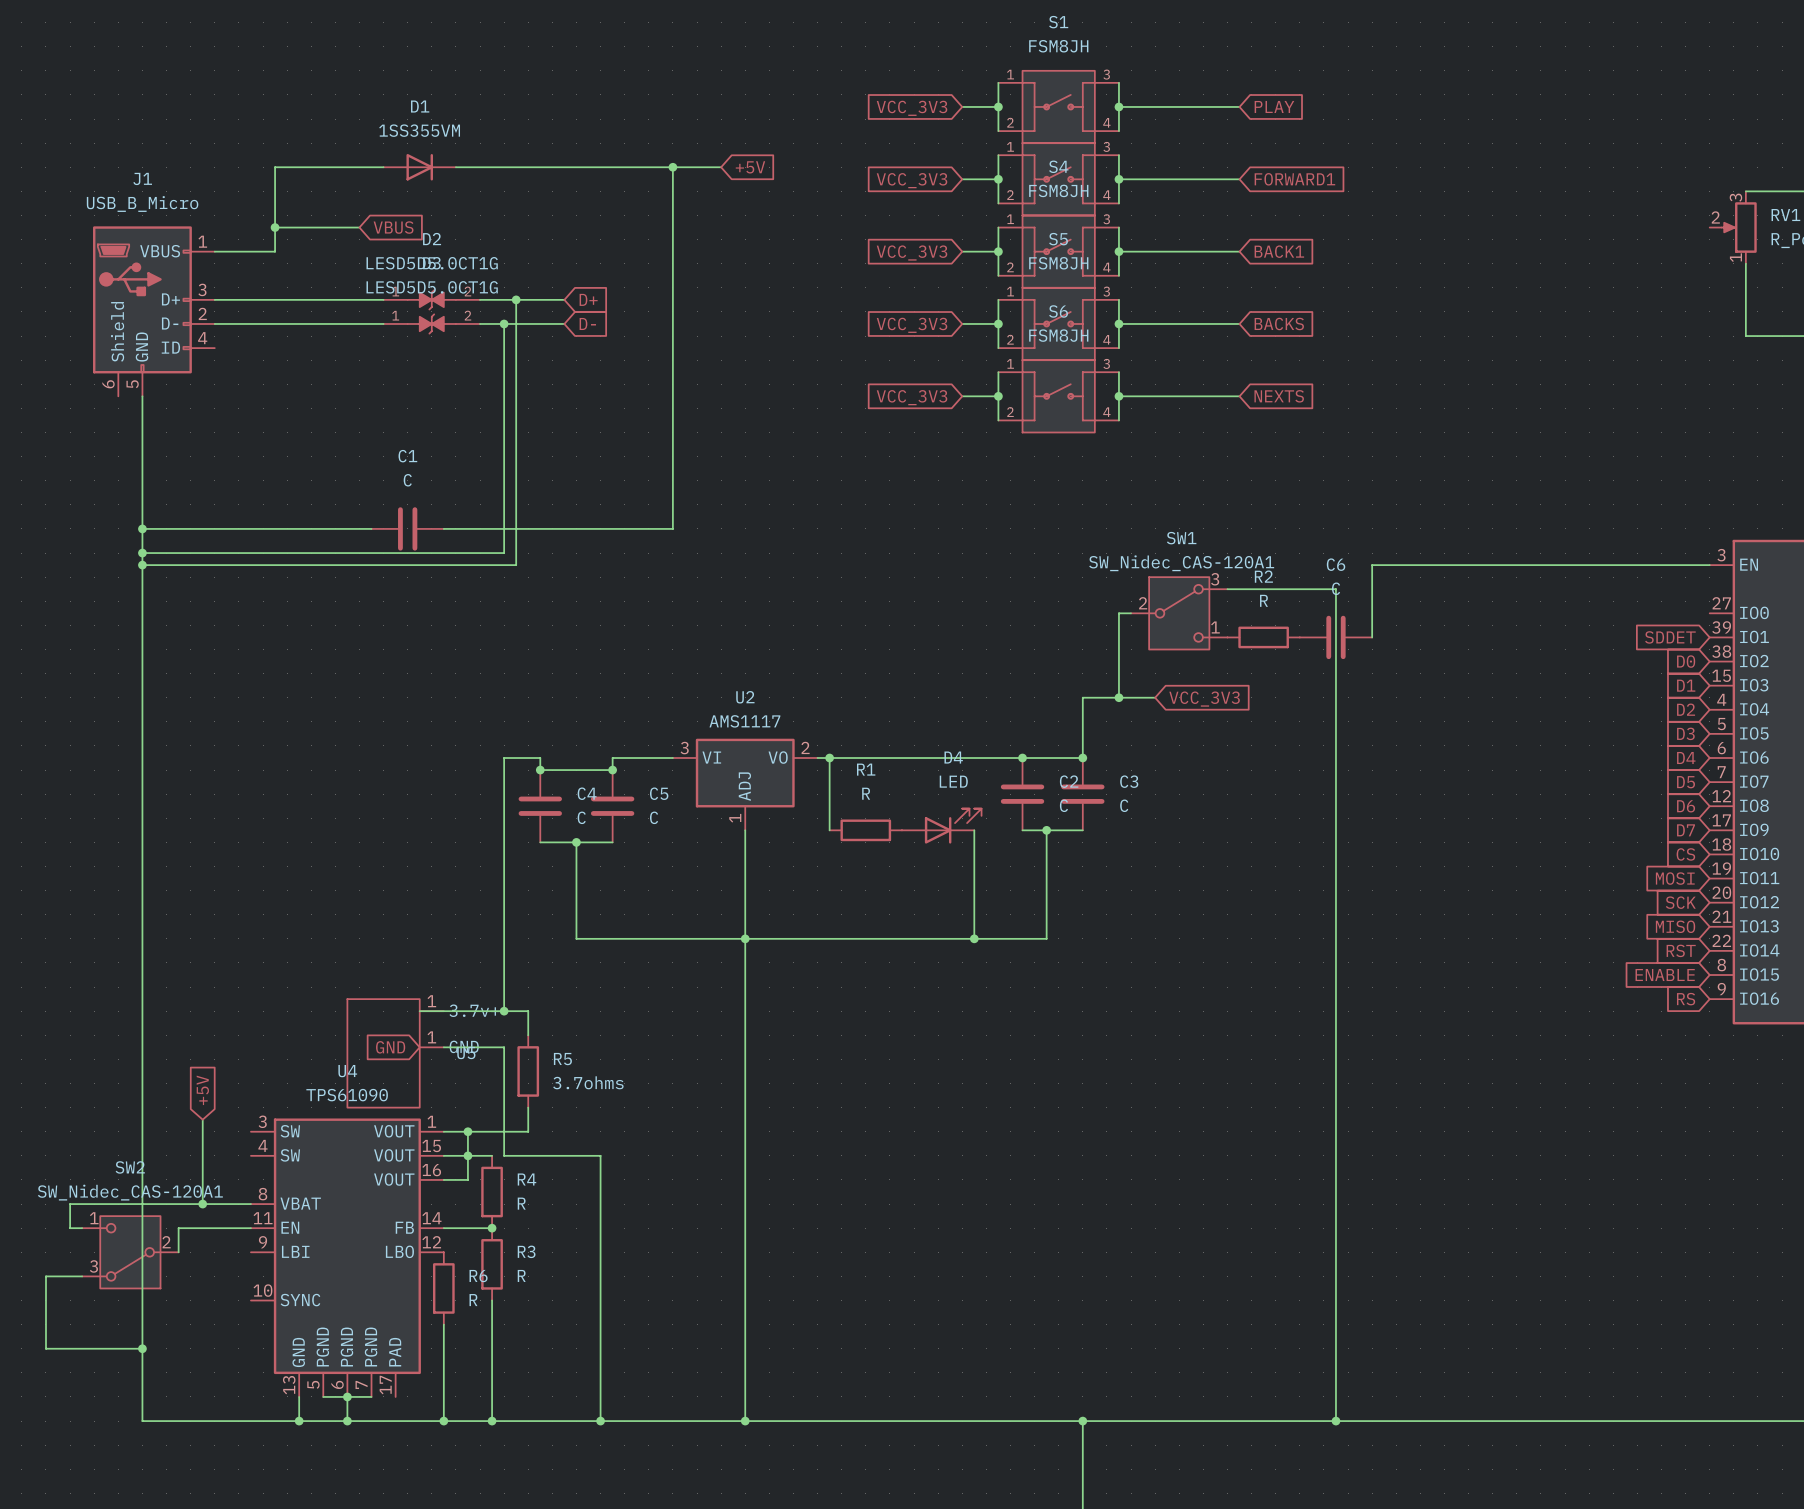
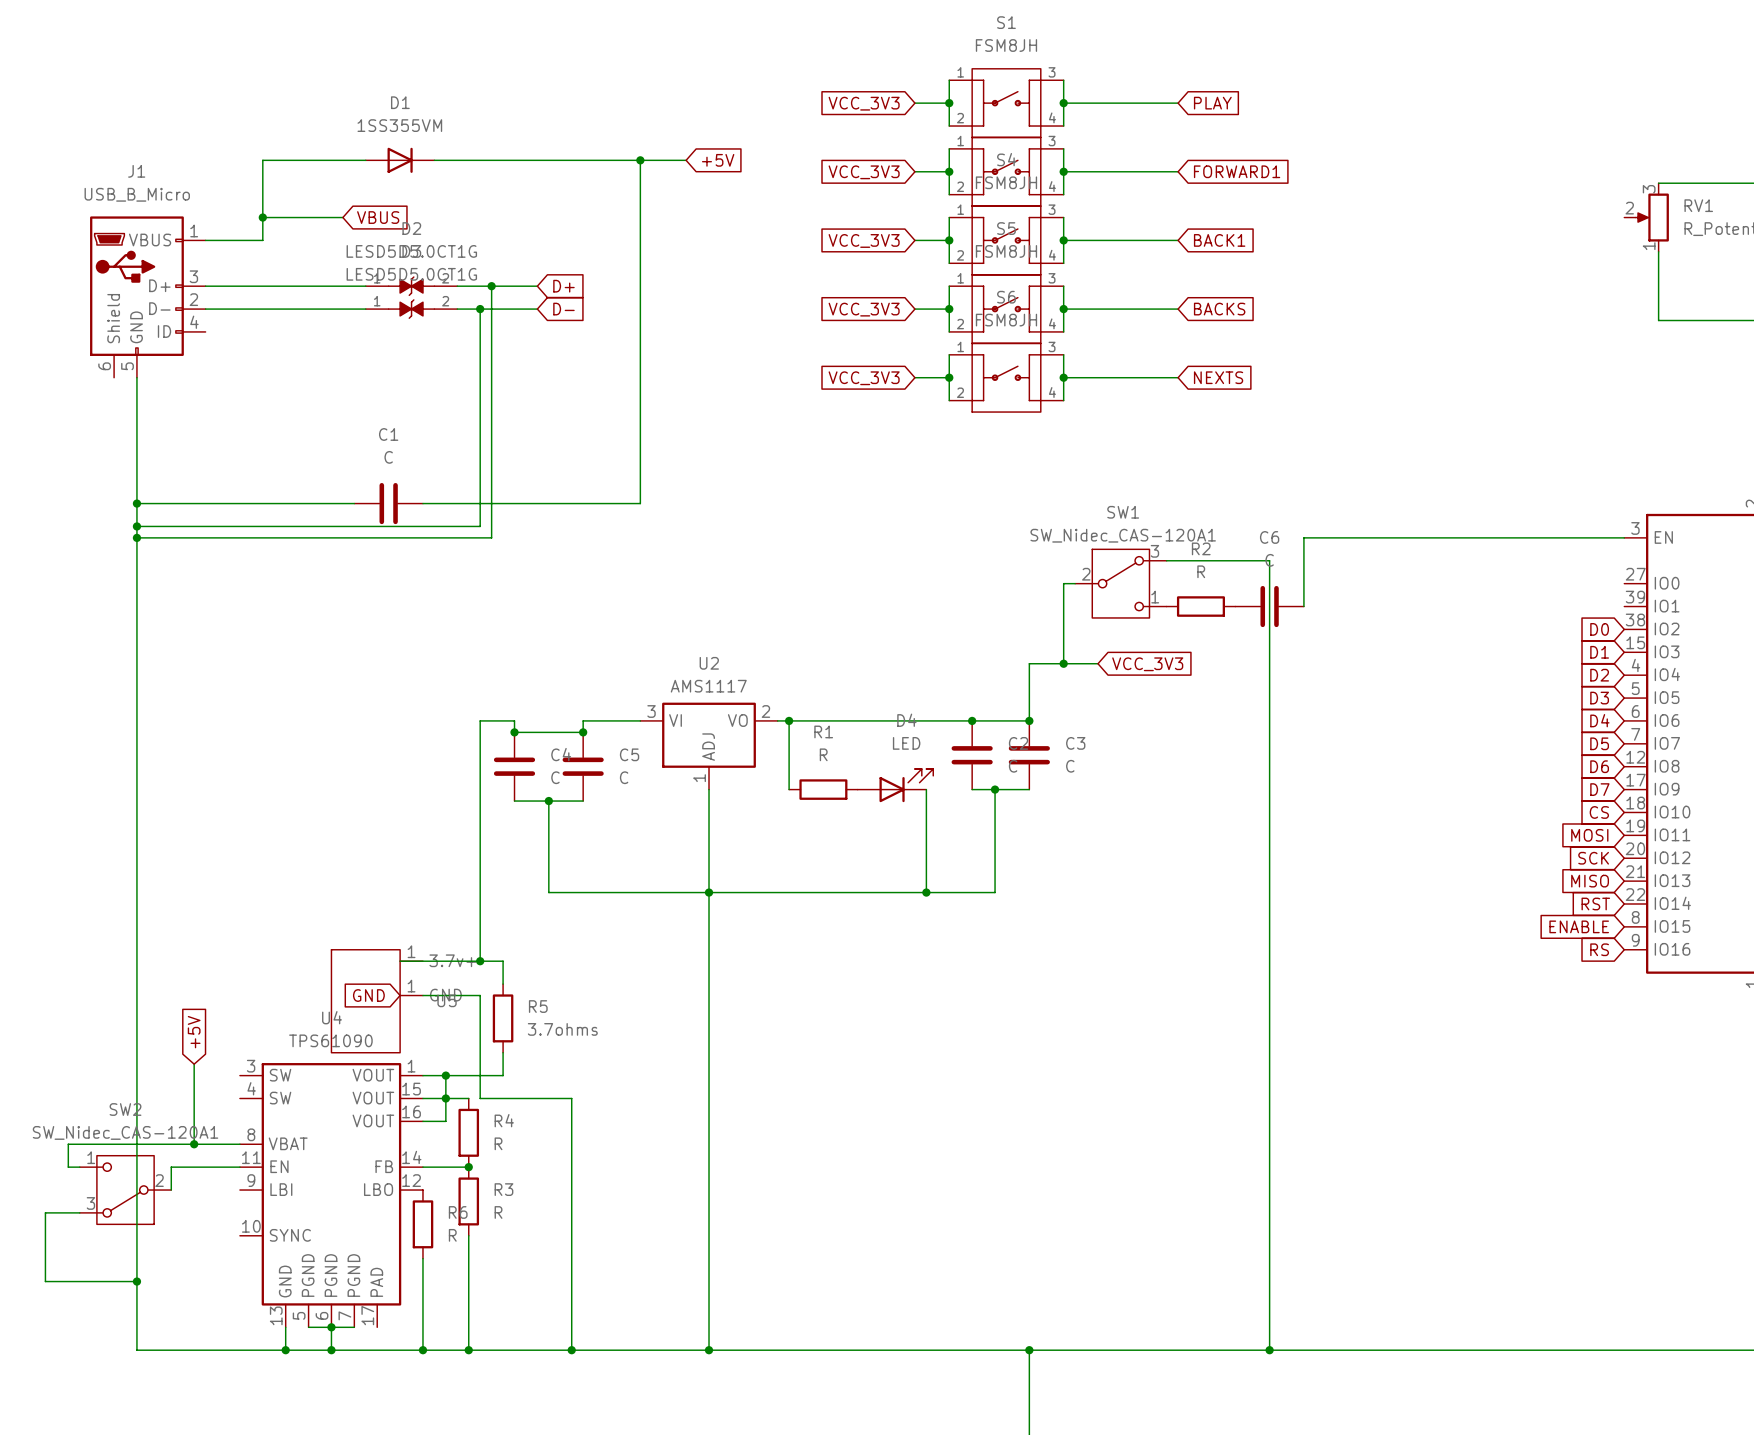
global label: SDDET (1670, 637) -> none

